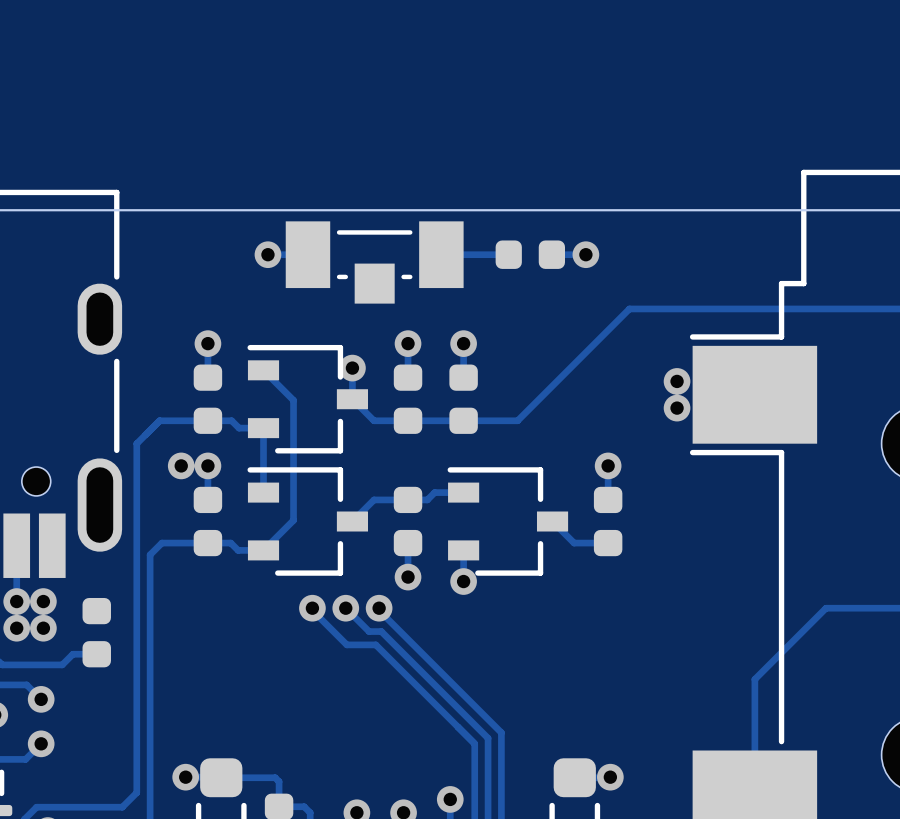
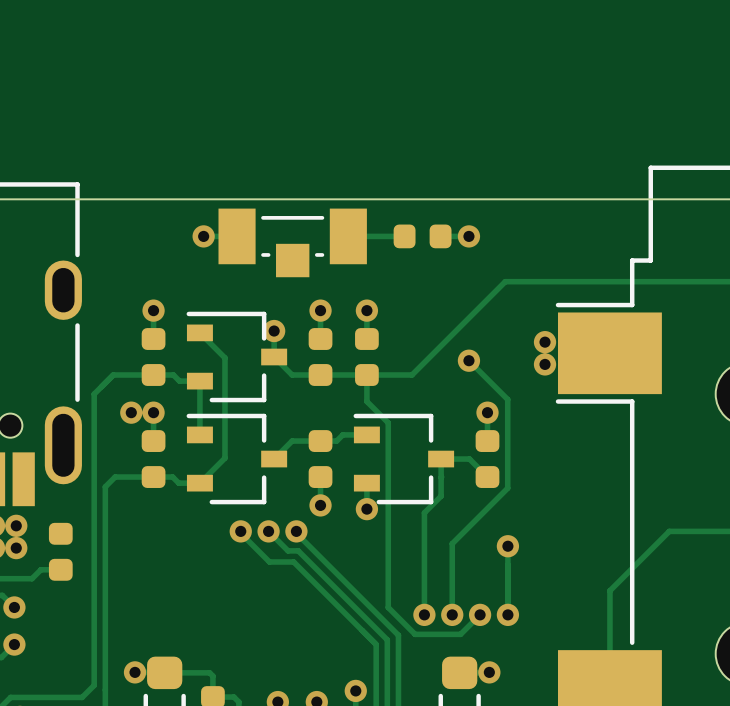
track: none -> (468, 360) (507, 399) (507, 488) (452, 543) (452, 614)
via: none -> (468, 360)
track: none -> (366, 375) (366, 401) (388, 422) (388, 607) (415, 634) (460, 634) (480, 614)
track: (552, 521) (574, 543) (608, 543) -> (424, 614) (424, 512) (441, 496) (441, 459) (469, 459) (487, 477)
track: none -> (507, 546) (507, 614)
via: none -> (507, 546)
via: none -> (424, 614)
via: none -> (452, 614)
via: none -> (480, 614)
via: none -> (507, 614)

